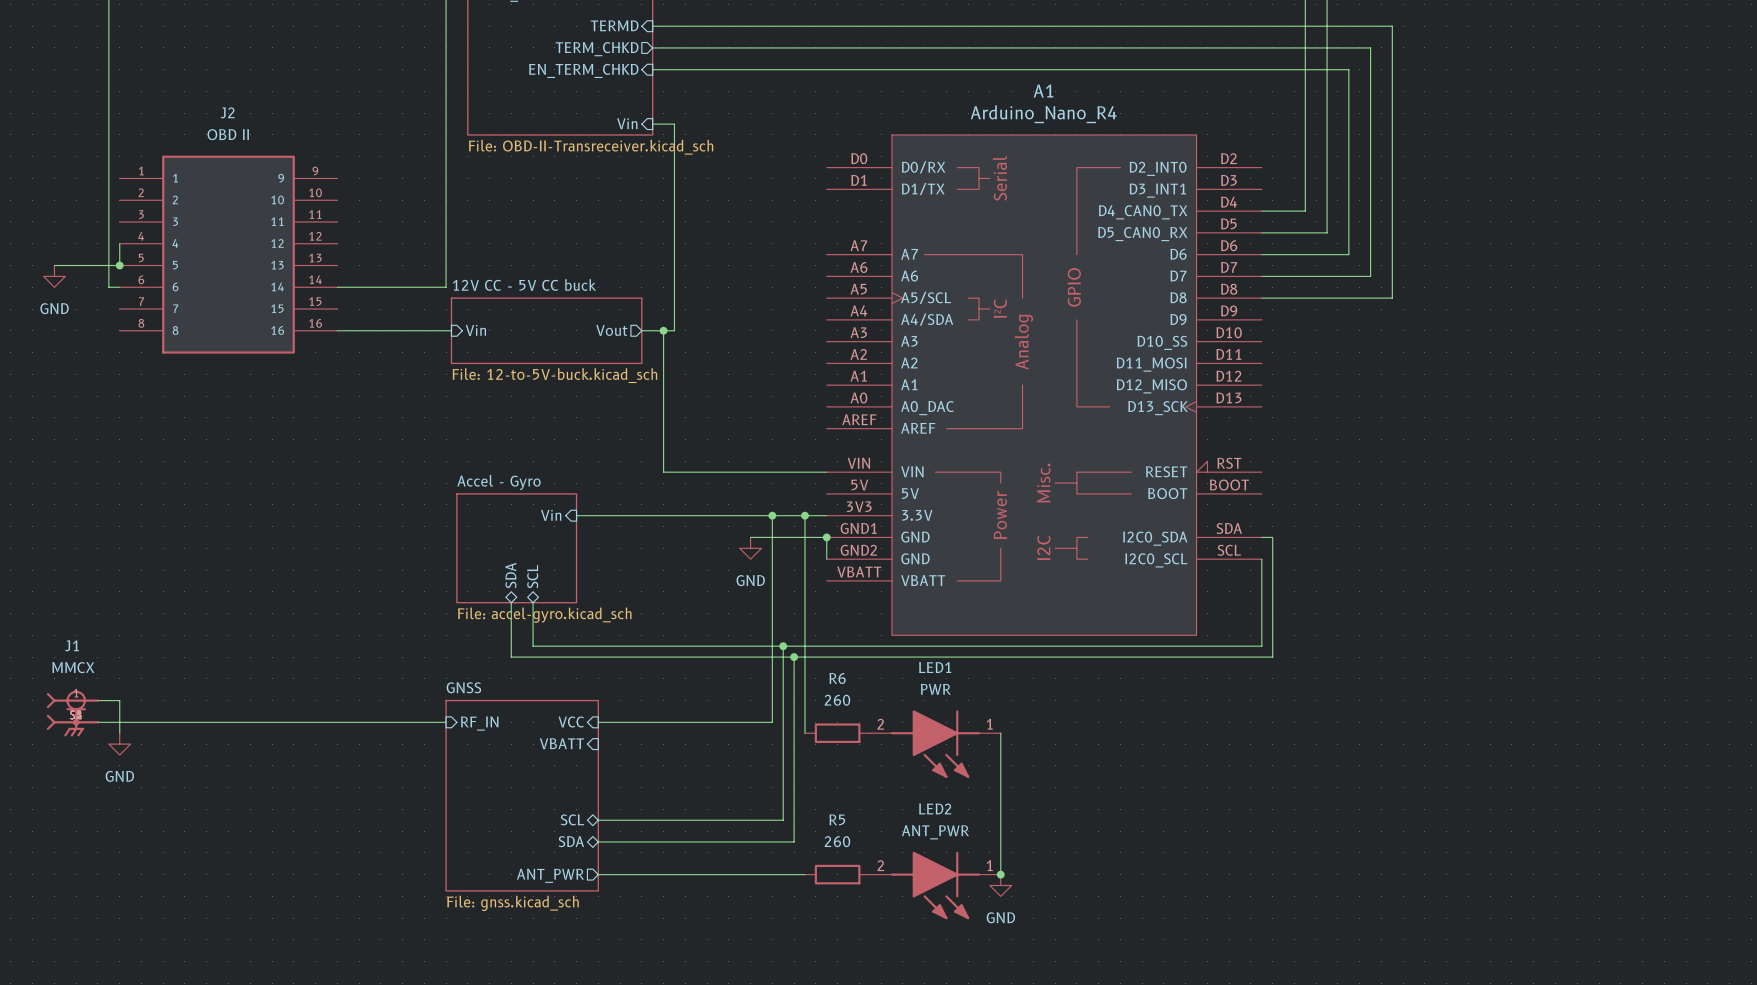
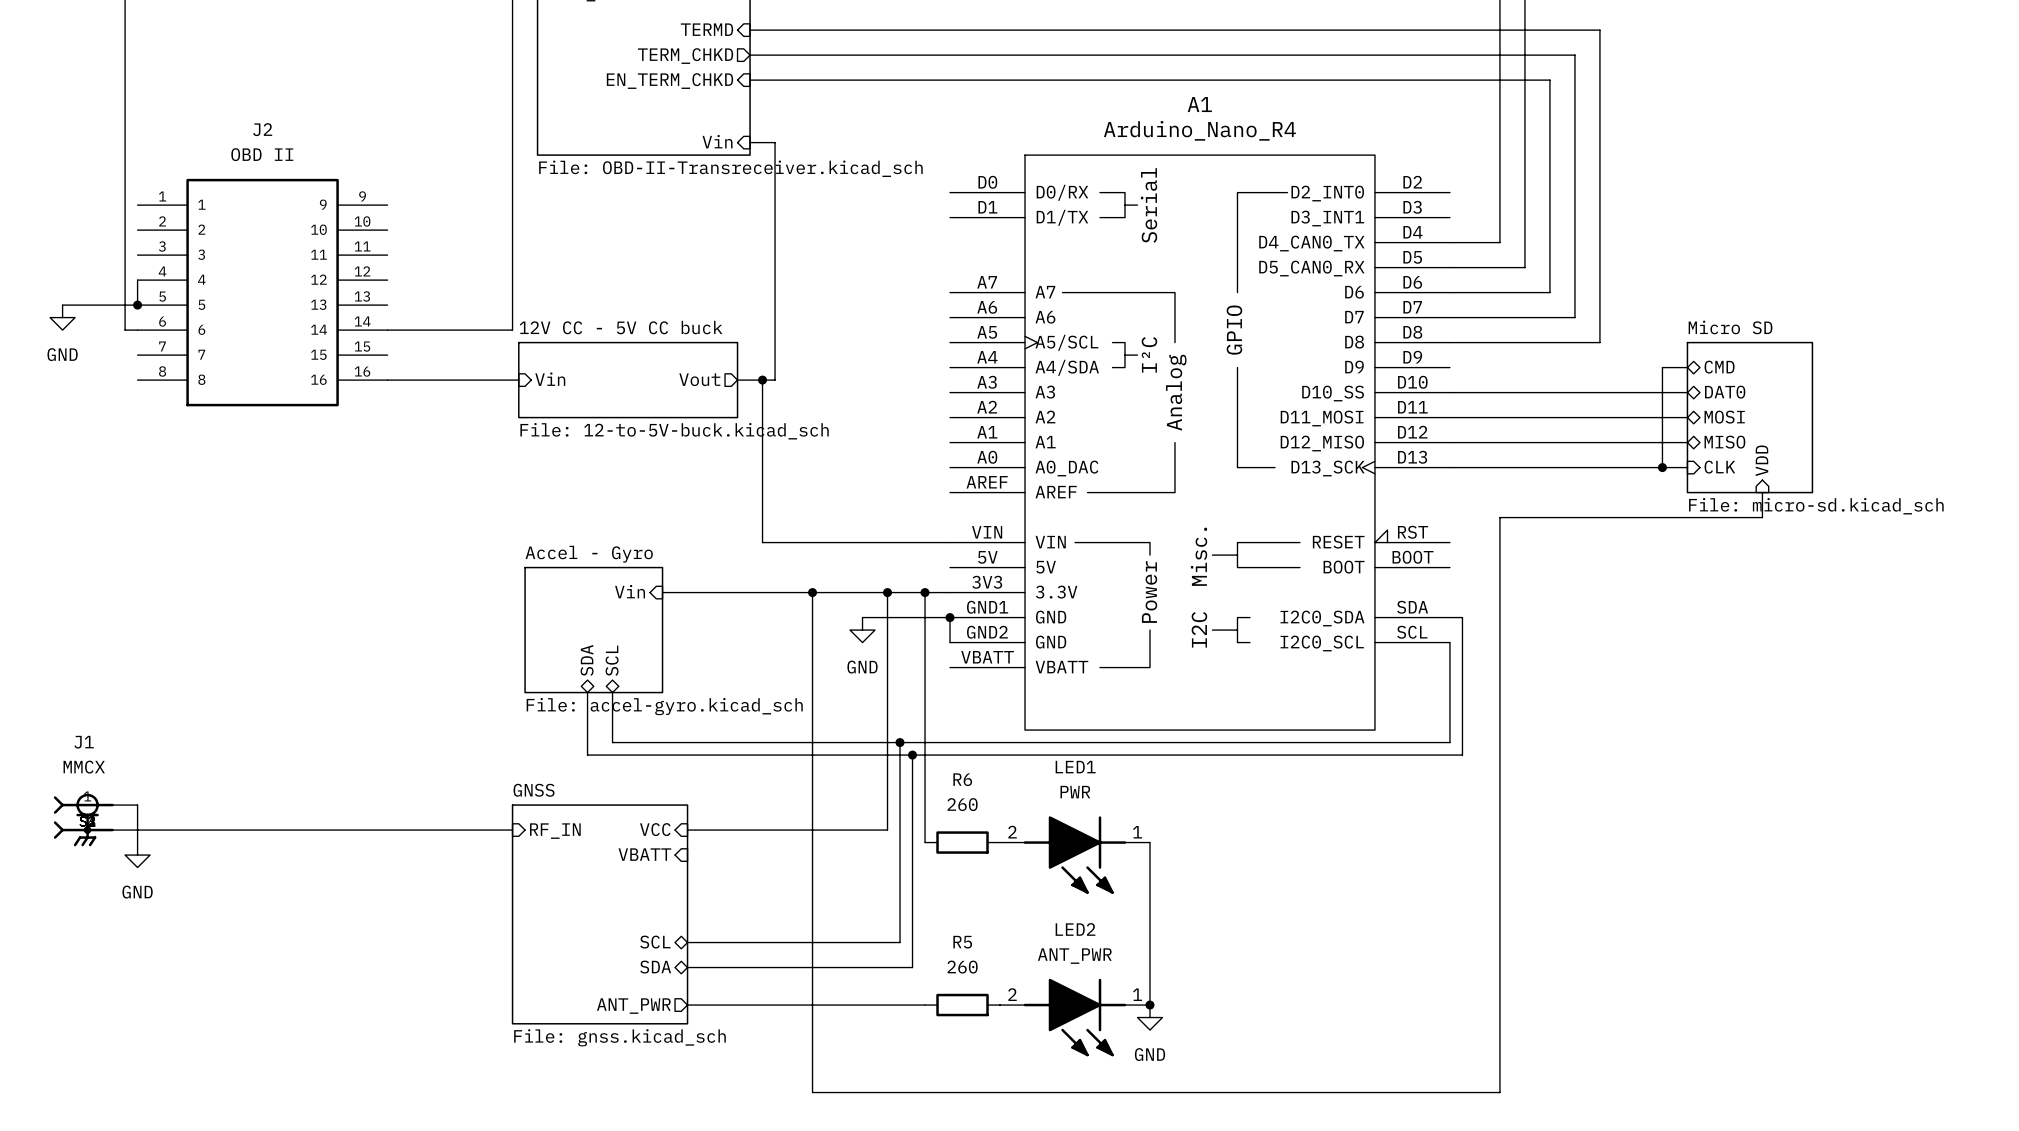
wire: none -> (1687, 367) (1662, 367) (1662, 467)
sheet pin: none -> CMD (1719, 367)
wire: none -> (1449, 392) (1687, 392)
sheet pin: none -> DAT0 (1725, 392)
wire: none -> (1449, 417) (1687, 417)
sheet pin: none -> MOSI (1724, 417)
sheet Micro SD: none -> File: micro-sd.kicad_sch (1749, 417)
sheet pin: none -> MISO (1724, 442)
wire: none -> (1449, 442) (1687, 442)
sheet pin: none -> VDD (1761, 460)
wire: none -> (1449, 467) (1687, 467)
junction: none -> (1662, 467)
sheet pin: none -> CLK (1719, 467)
wire: none -> (1762, 492) (1762, 517) (1499, 517) (1499, 1092) (812, 1092) (812, 592)
junction: none -> (812, 592)

